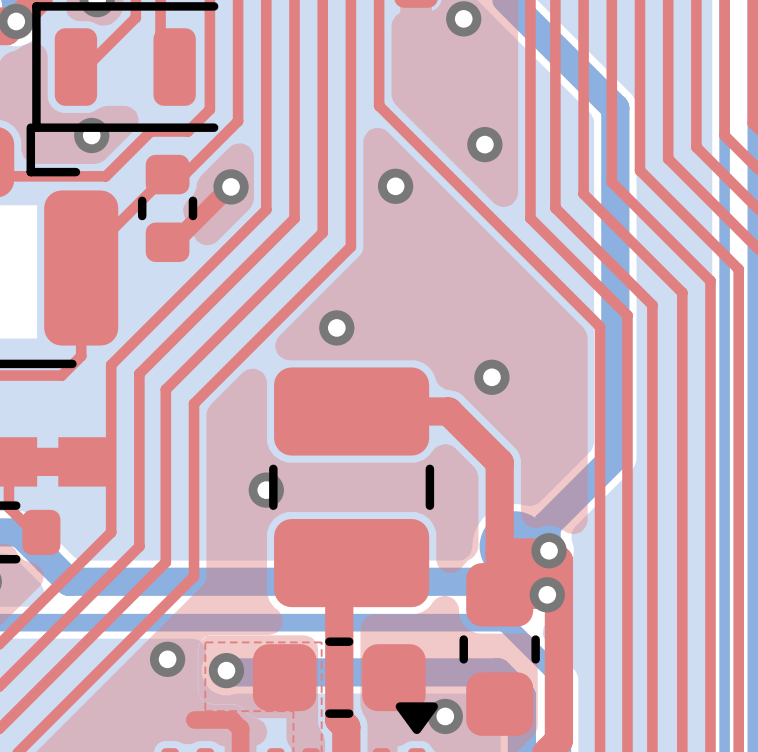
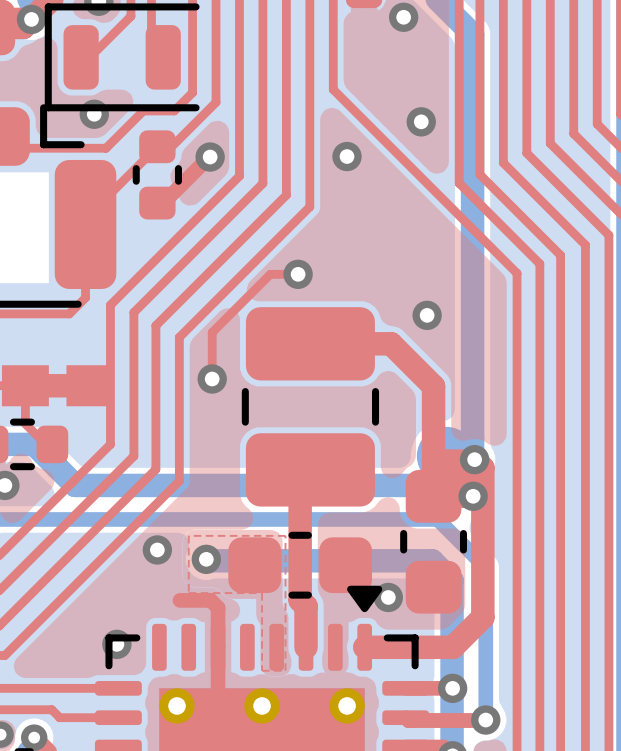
bottom track: (546, 39) (615, 108) (615, 456) (546, 525) -> (472, 34) (472, 438)
top track: none -> (298, 274) (270, 274) (212, 332) (212, 379)
via position: (266, 490) -> (212, 379)

